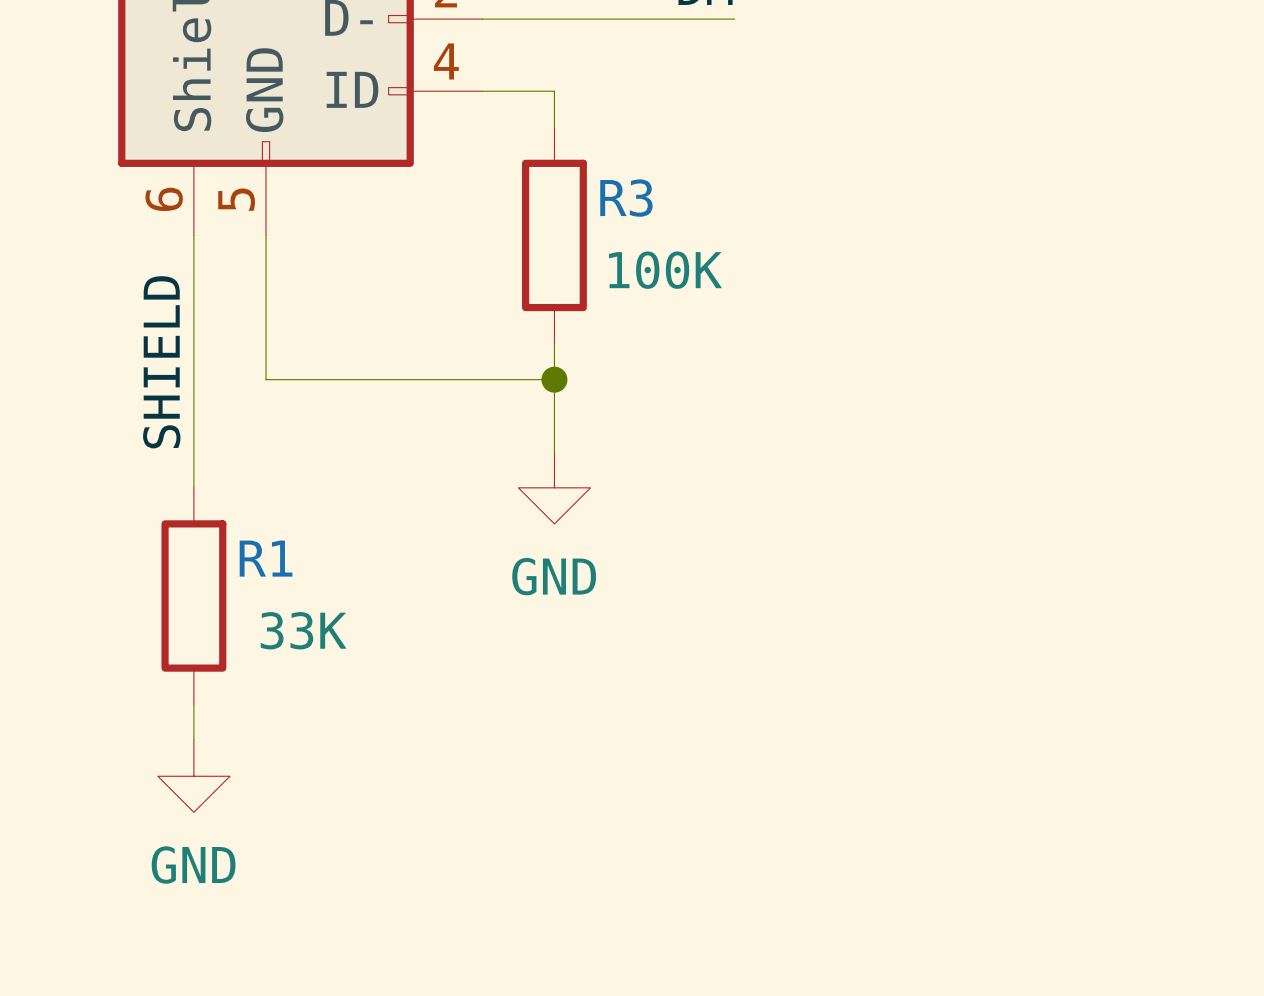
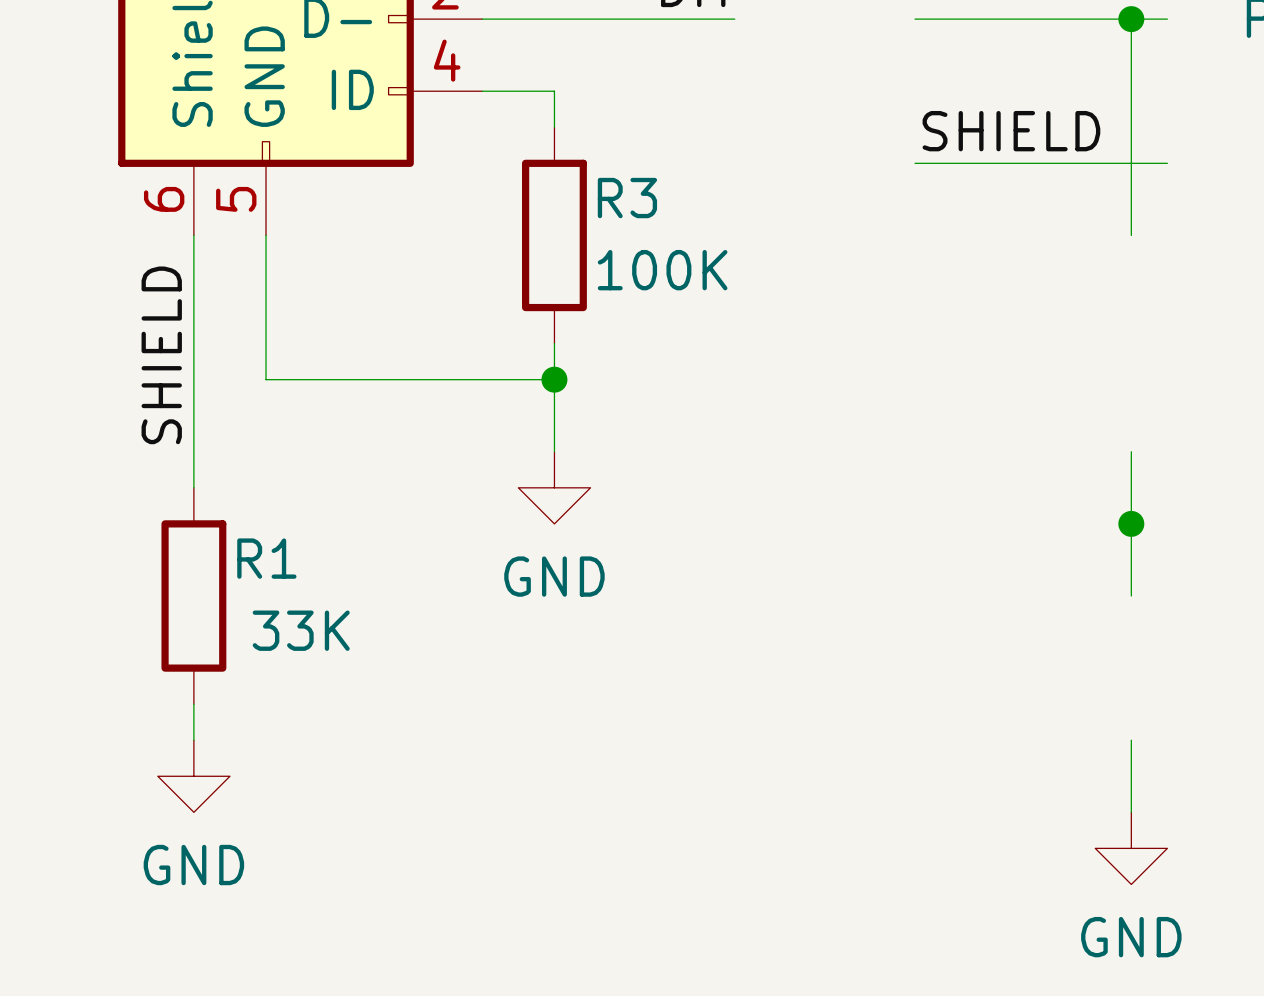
wire: none -> (915, 19) (1167, 19)
wire: none -> (1131, 19) (1131, 235)
junction: none -> (1131, 19)
label: none -> SHIELD (1011, 131)
wire: none -> (915, 163) (1167, 163)
wire: none -> (1131, 451) (1131, 595)
junction: none -> (1131, 523)
wire: none -> (1131, 740) (1131, 812)
power symbol: none -> GND (1131, 848)

